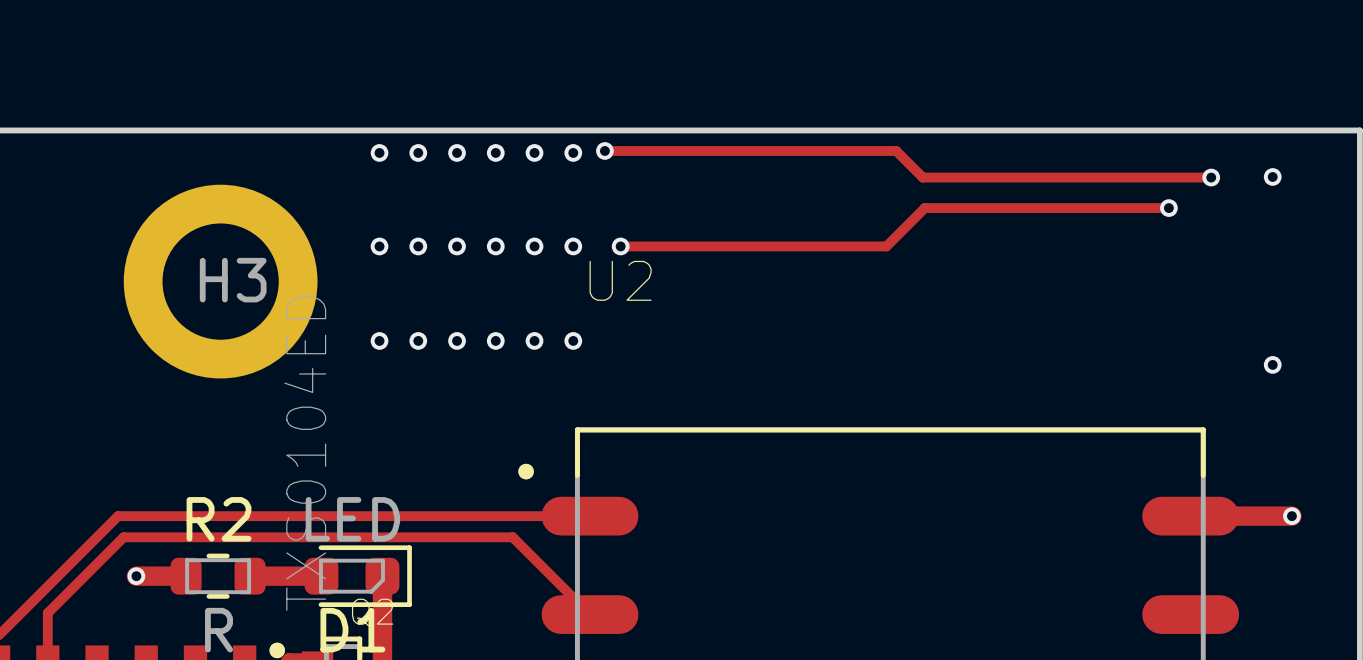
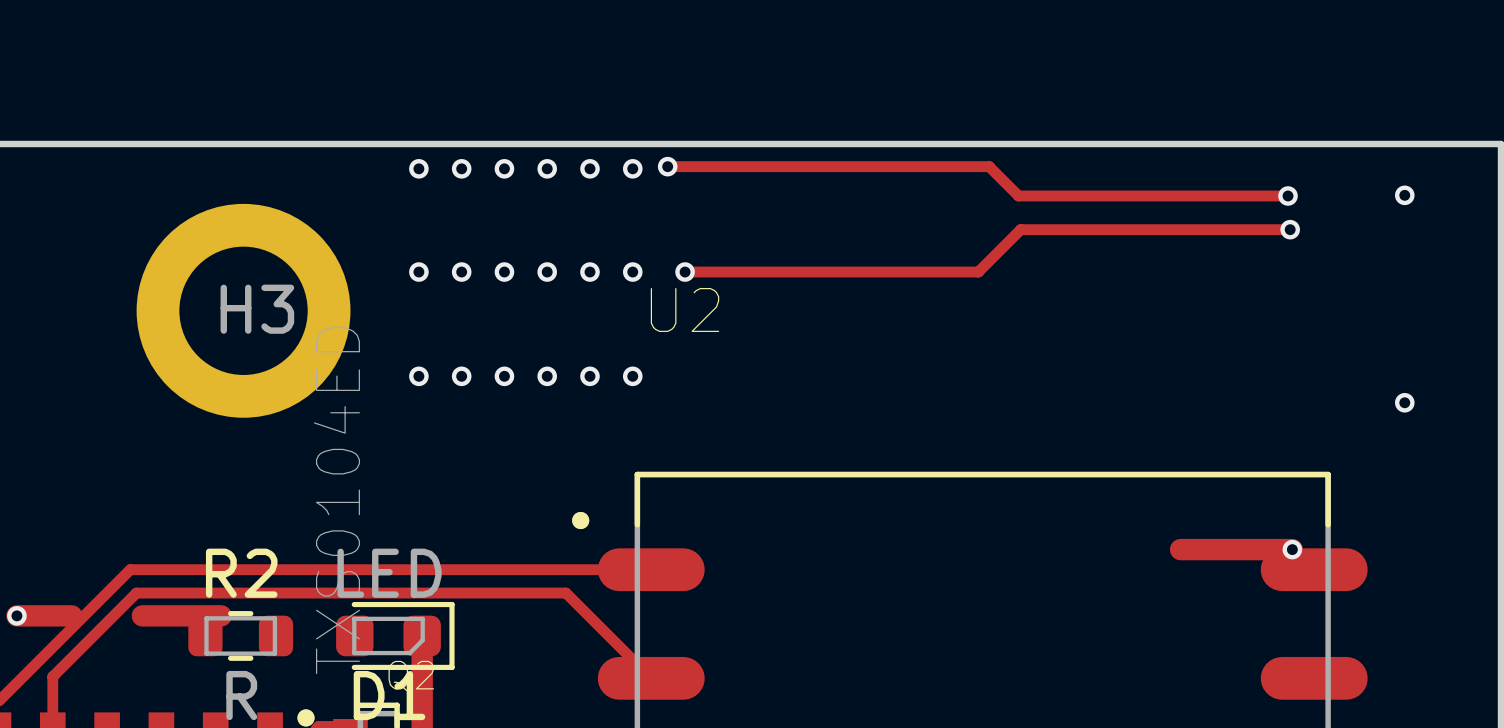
track: (1166, 177) (1211, 177) -> none
via position: (1211, 177) -> (1288, 195)
track: (1190, 516) (1291, 516) -> (1180, 549) (1292, 549)
via position: (1291, 516) -> (1292, 549)
via: none -> (16, 615)
track: (136, 576) (186, 576) -> (16, 615) (71, 615)
via: (136, 576) -> none
track: (250, 576) (321, 576) -> (142, 615) (221, 615)

